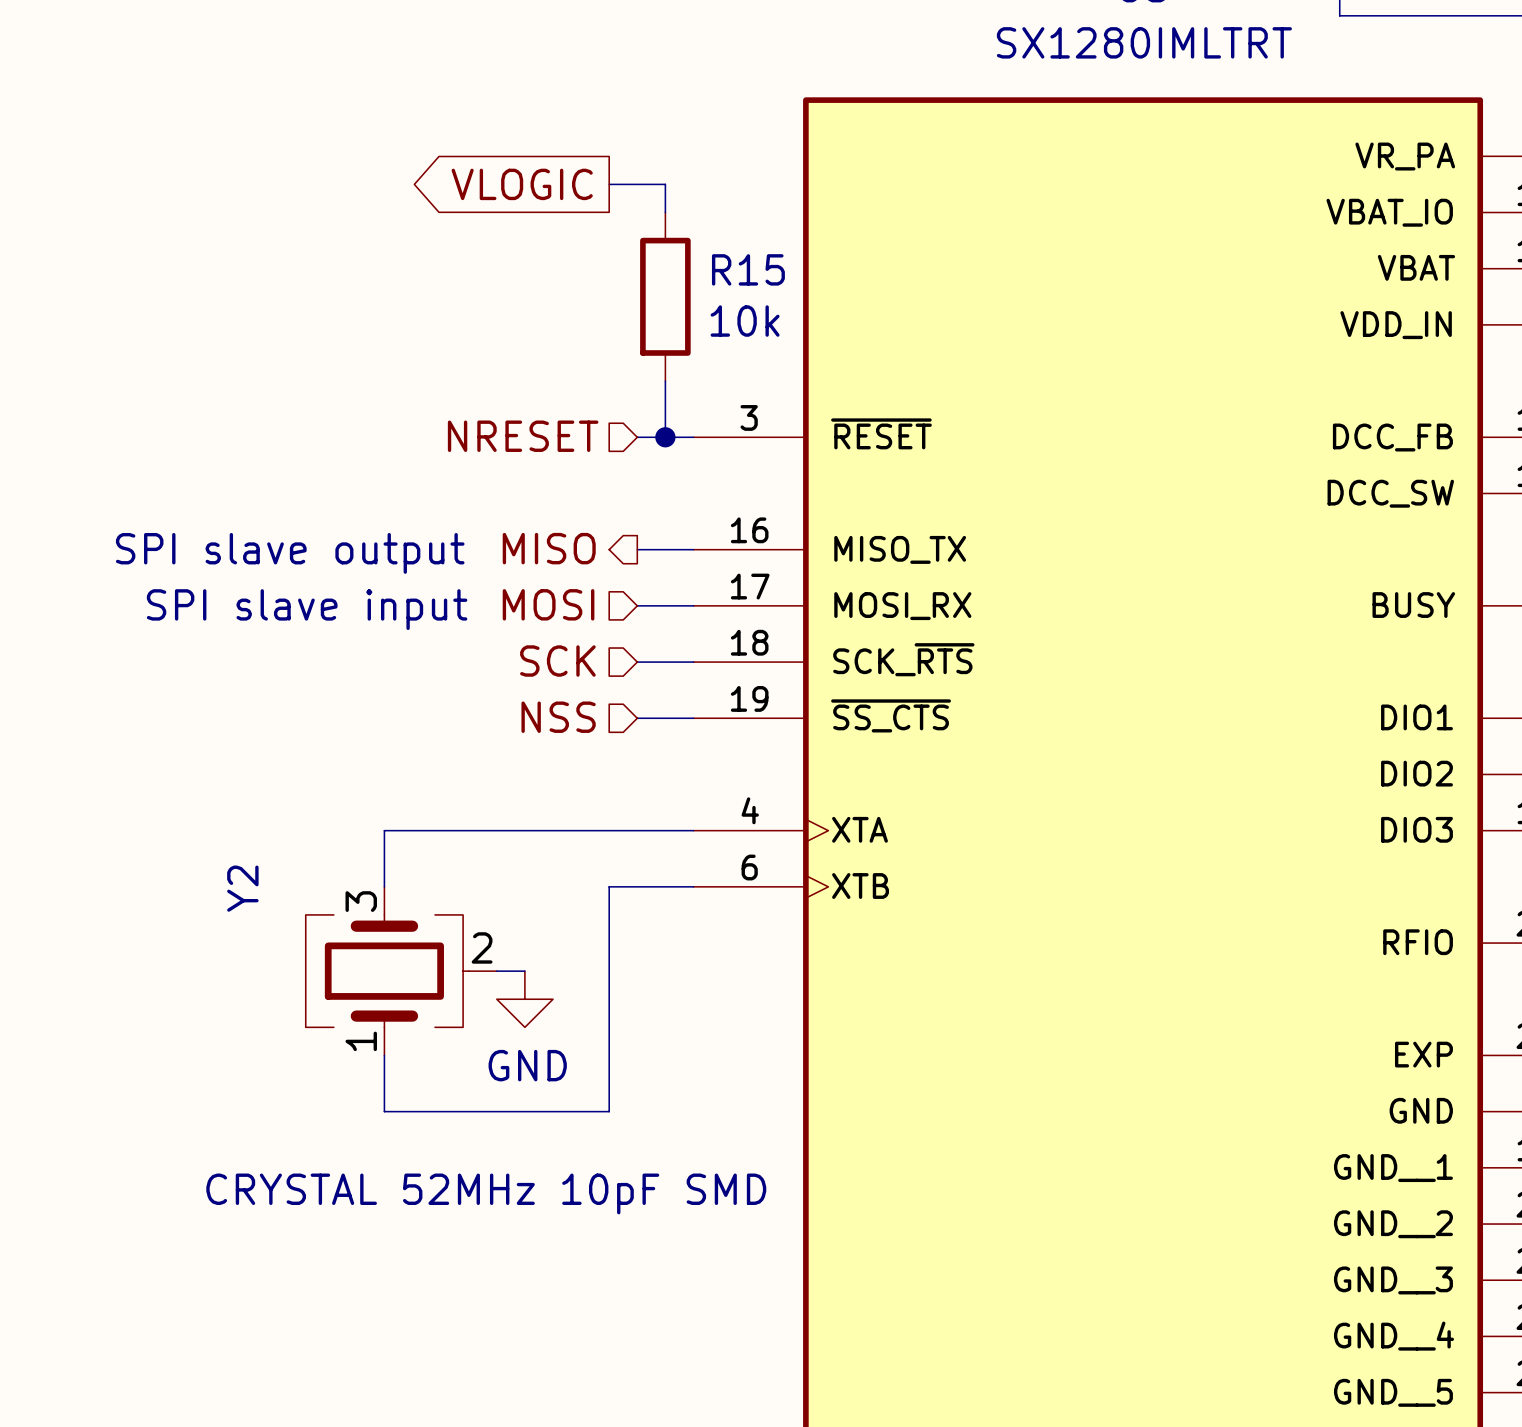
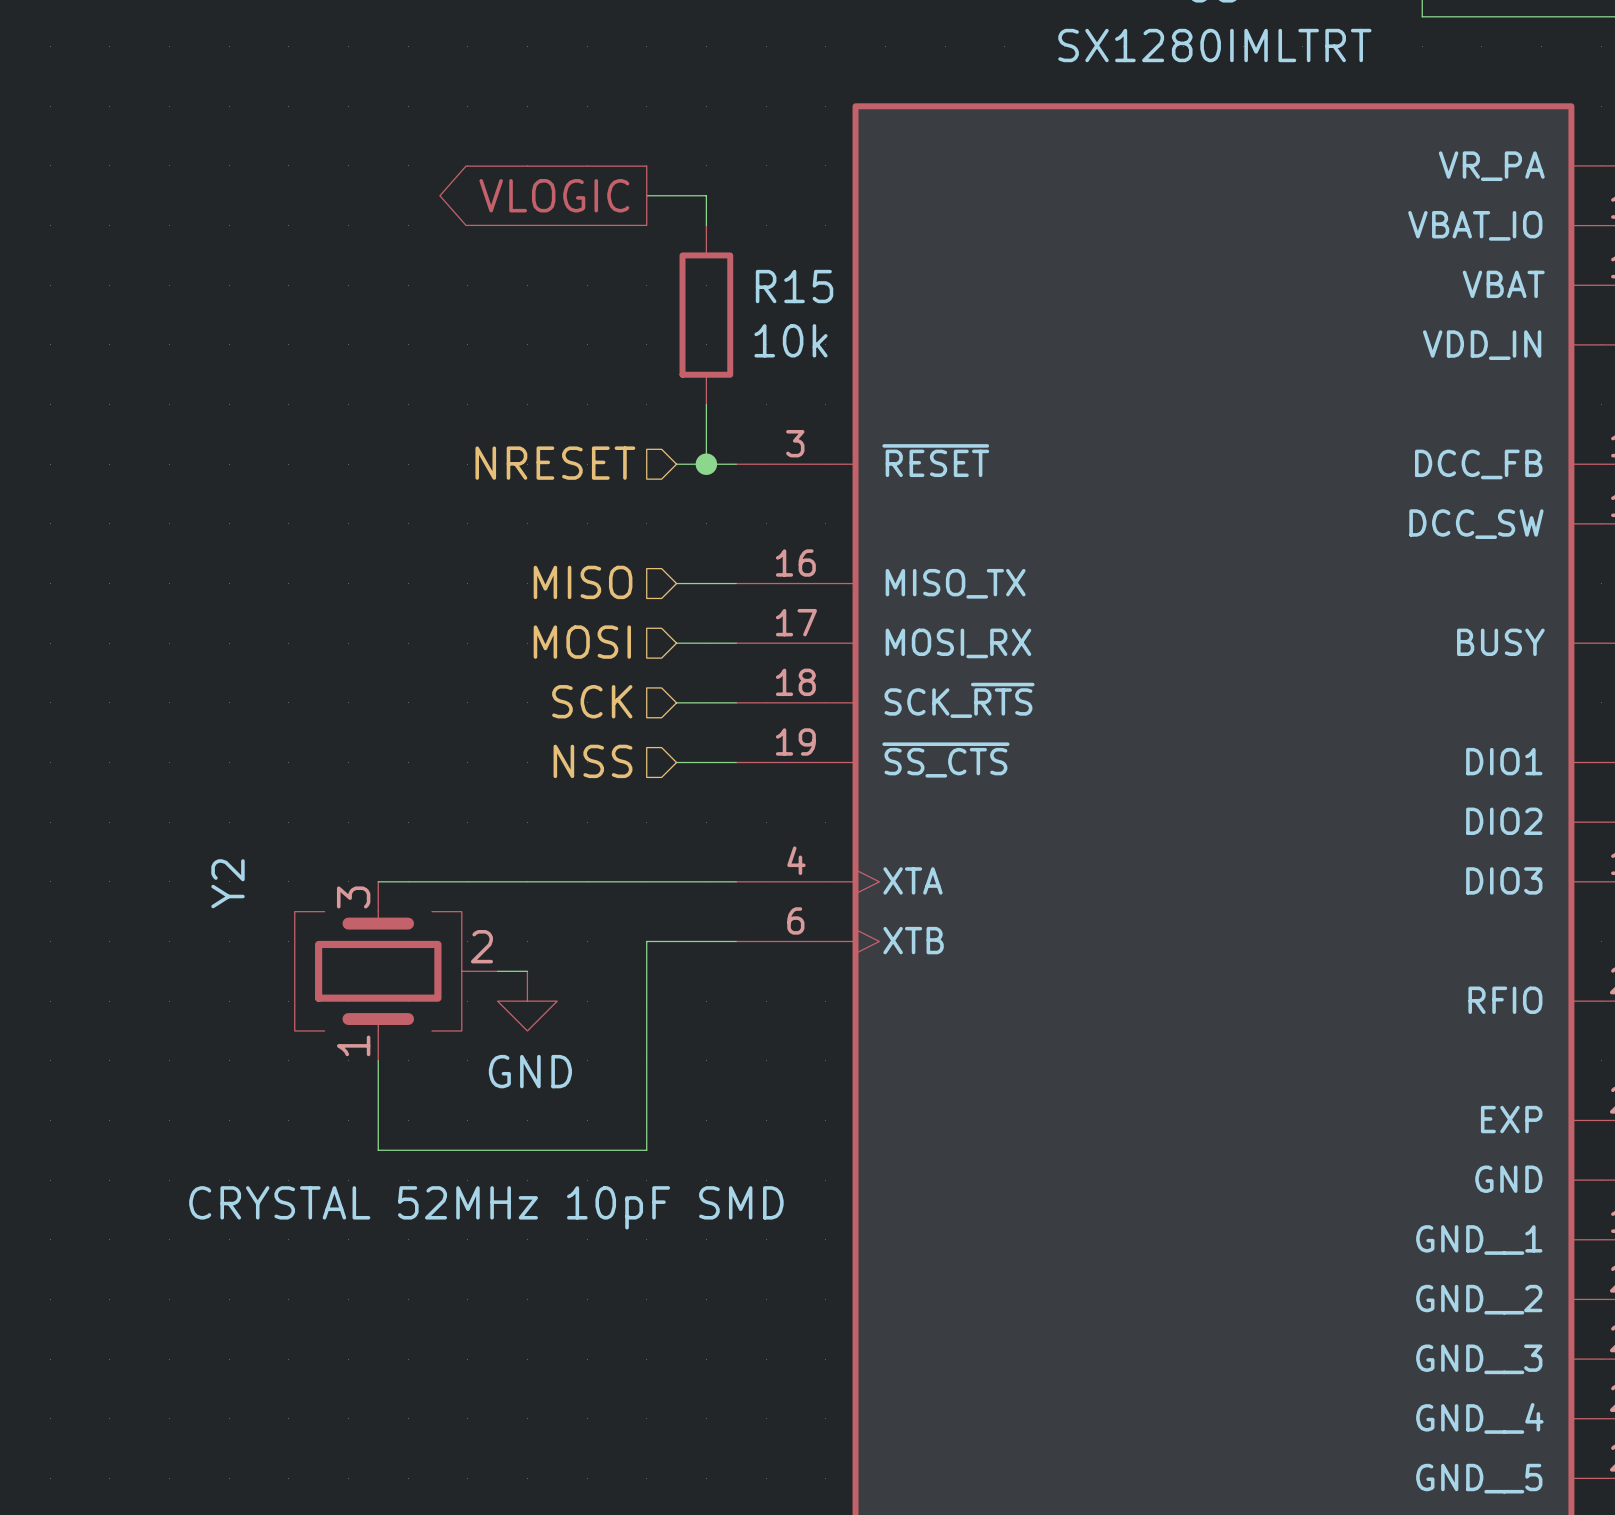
hierarchical label shape: output (549, 548) -> input (583, 582)
text: SPI slave output (290, 553) -> none
text: SPI slave input (307, 609) -> none
wire: (384, 830) (384, 886) -> (408, 881) (378, 881)
Y2 position: (401, 971) -> (396, 971)
wire: (496, 971) (524, 971) -> (497, 971) (527, 971)
power symbol position: GND (524, 999) -> GND (527, 1001)
wire: (384, 1055) (384, 1111) (609, 1111) (609, 1083) -> (378, 1060) (378, 1150) (646, 1150)

